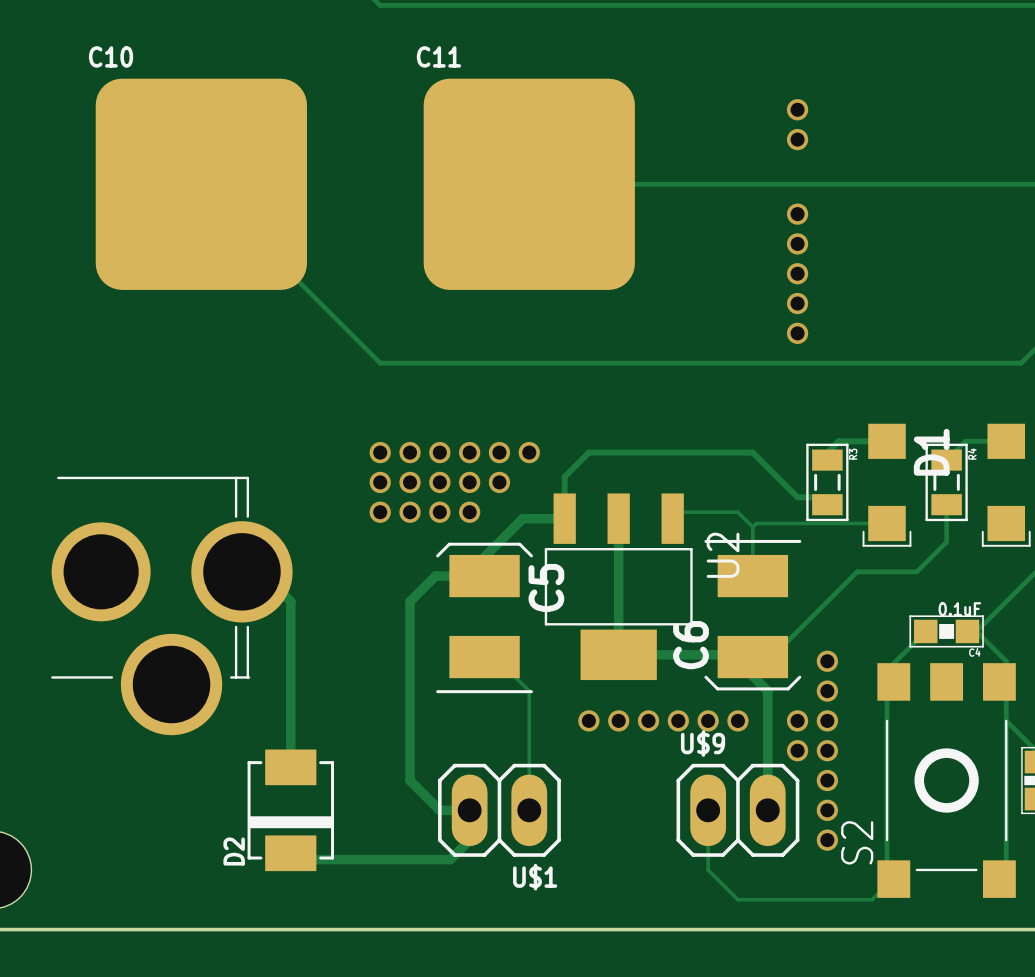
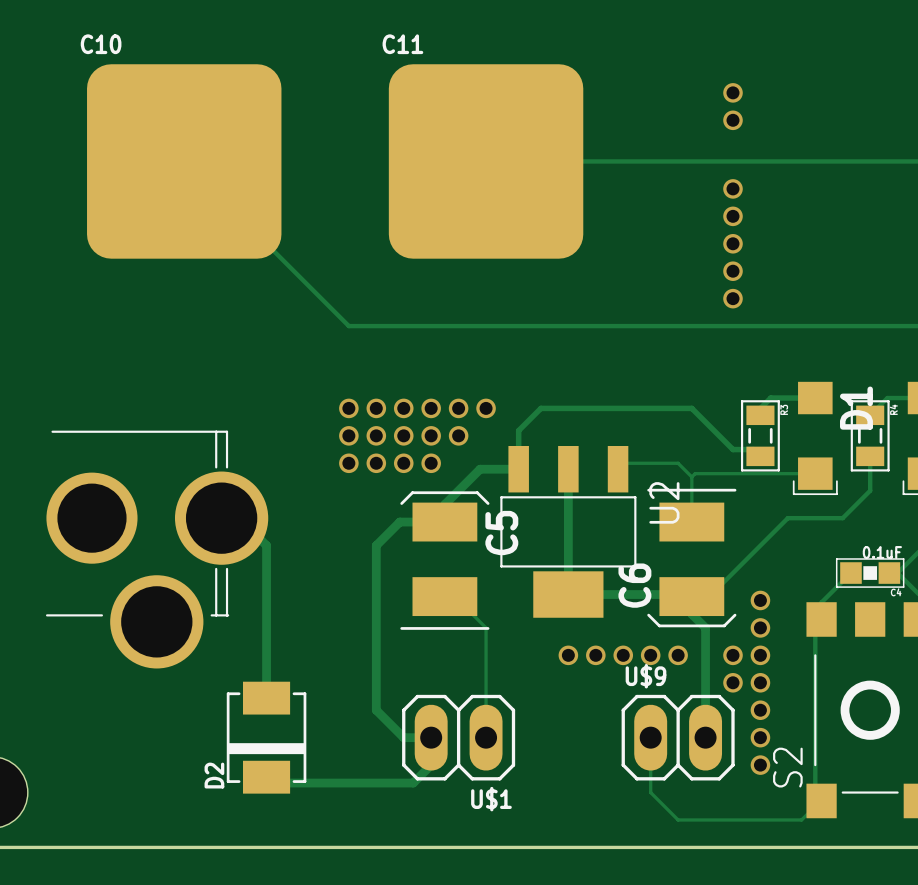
via: (588, 720) -> none

